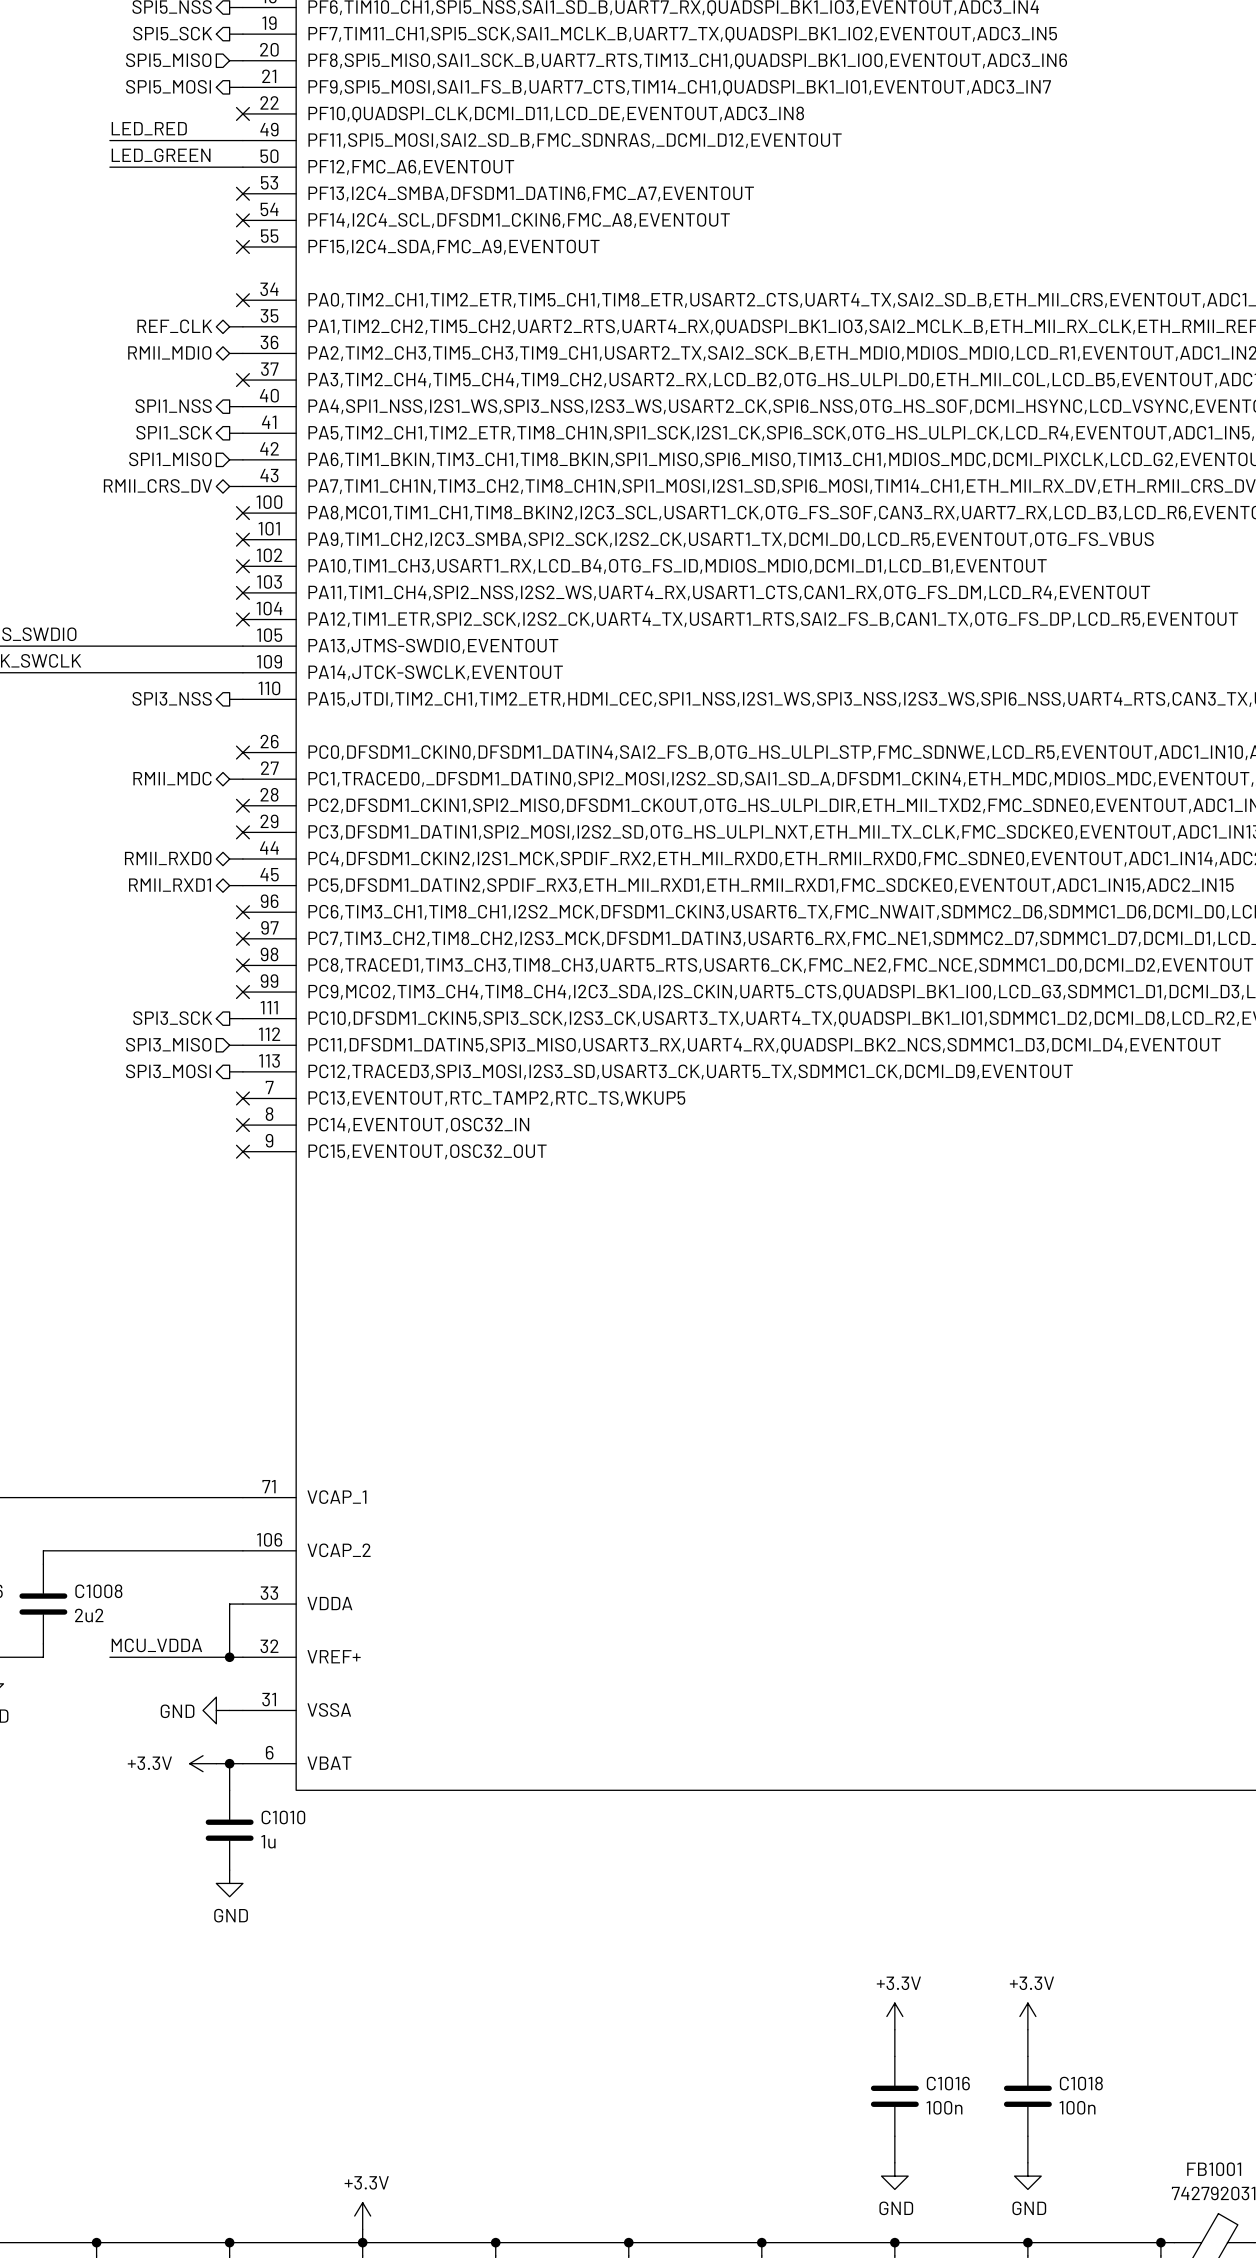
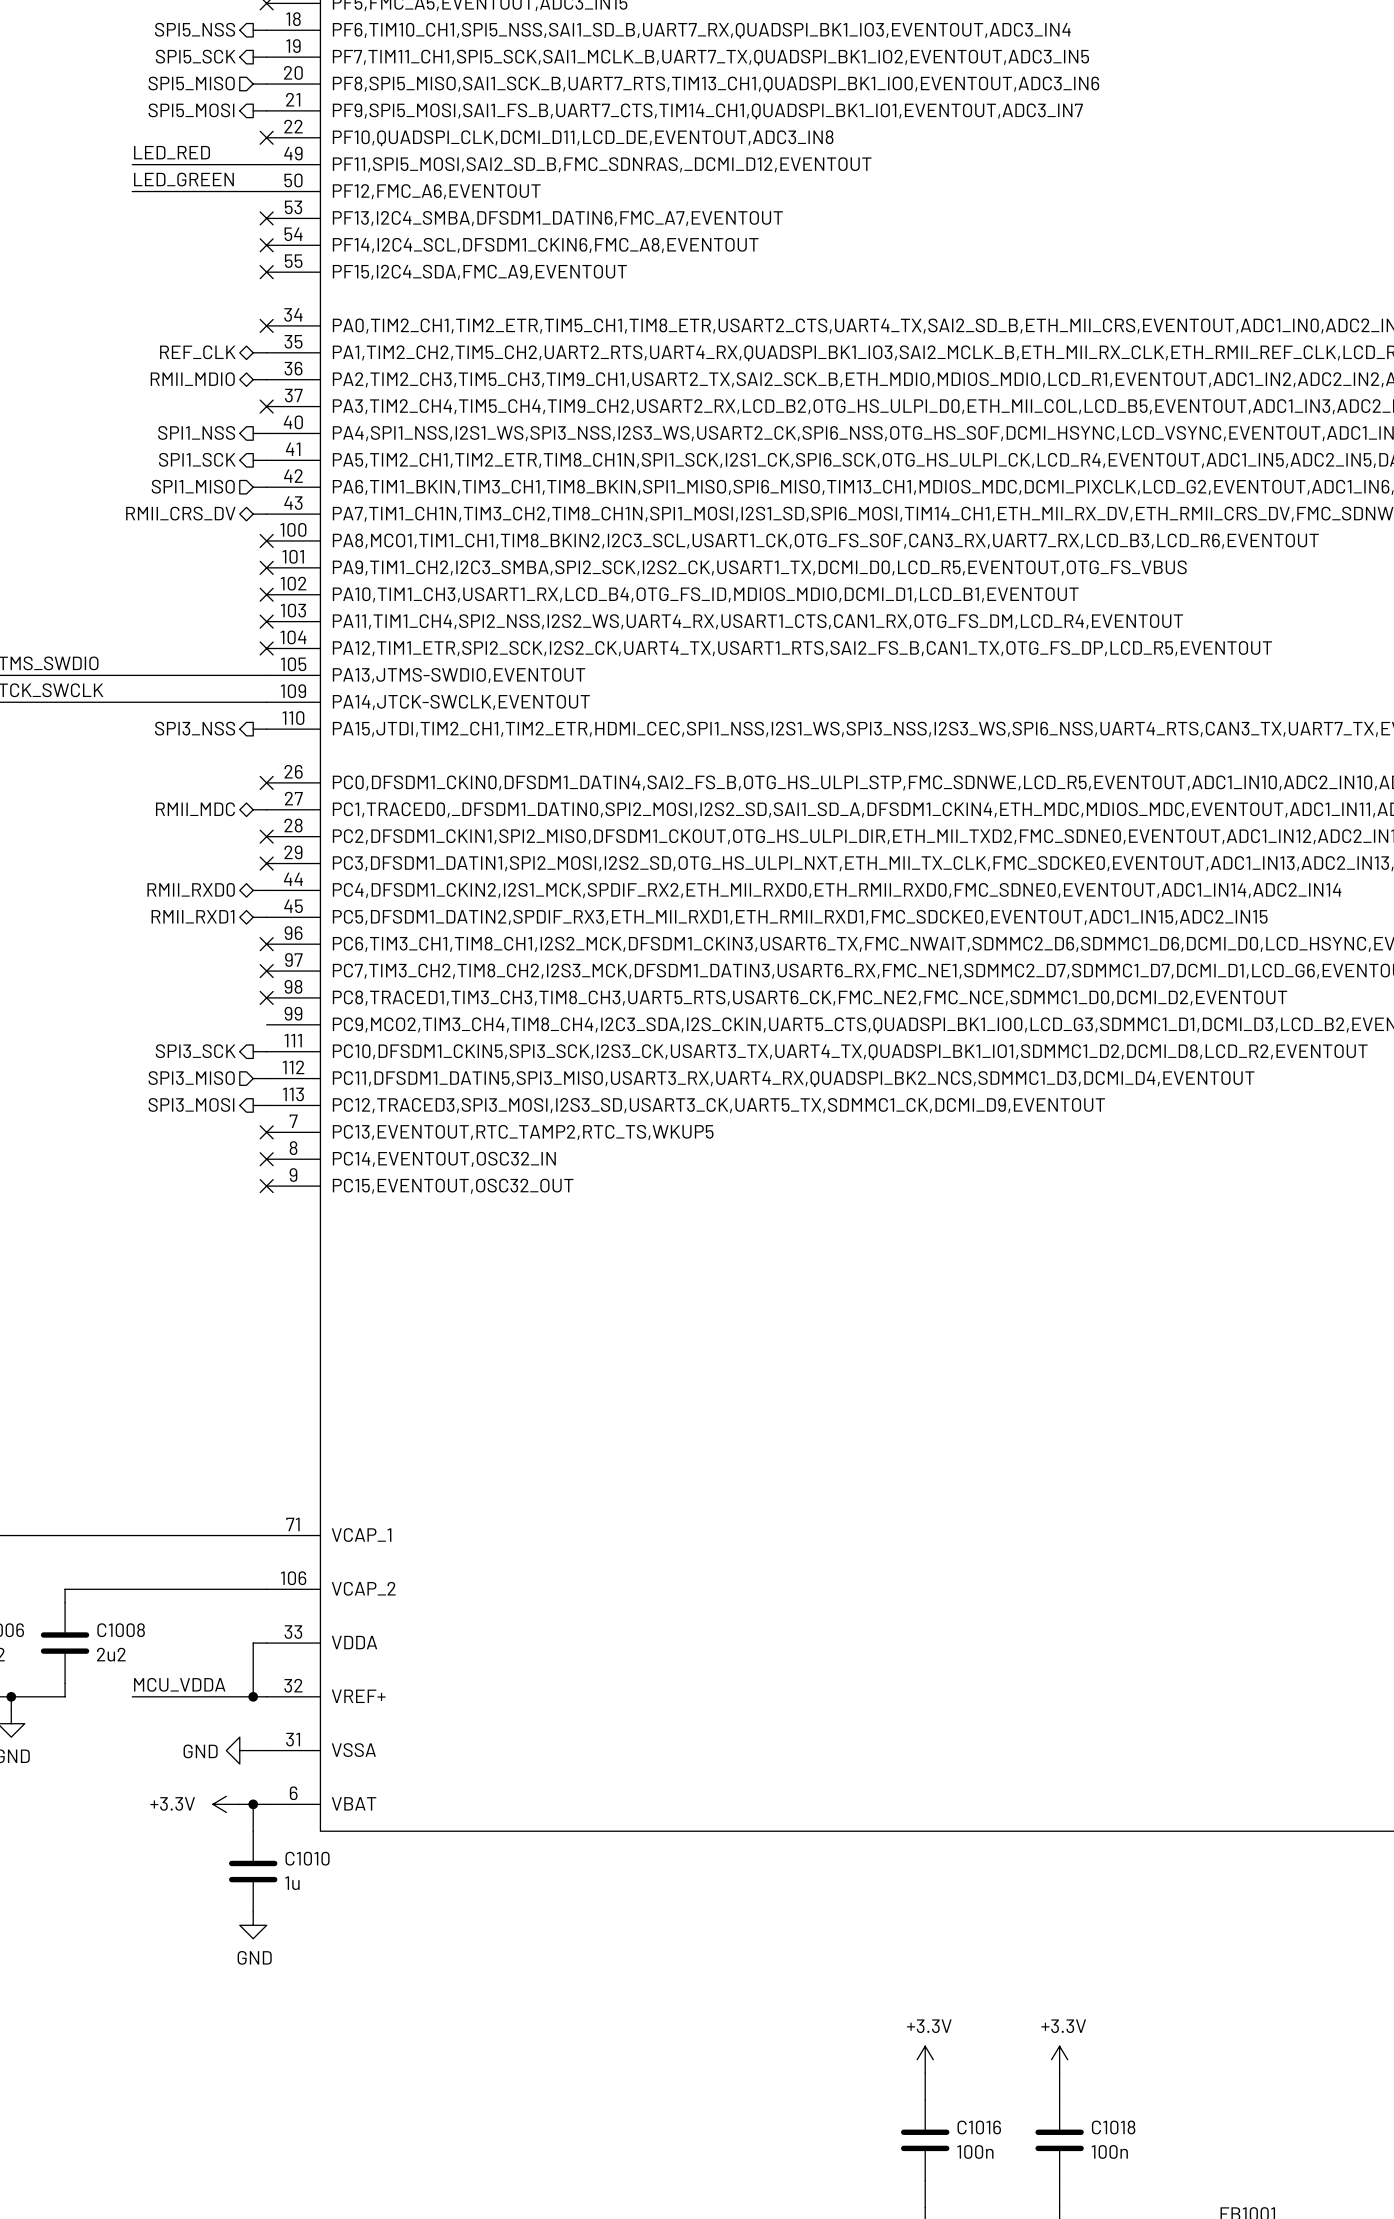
no-connect mark: (242, 992) -> none

